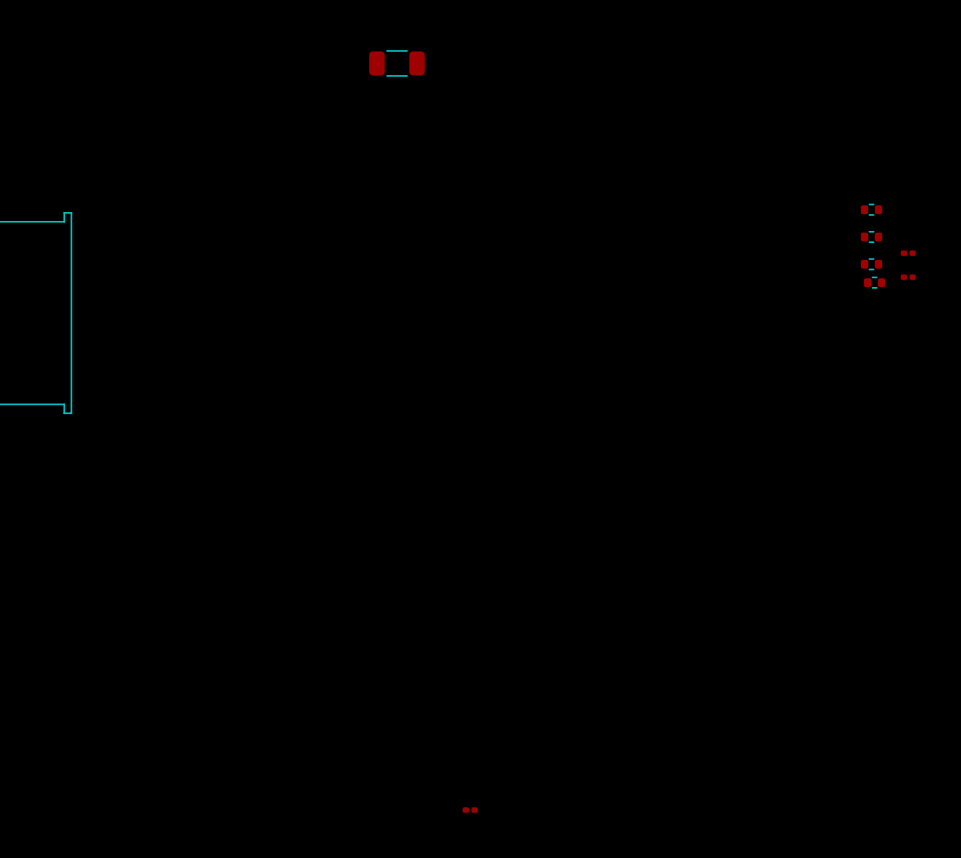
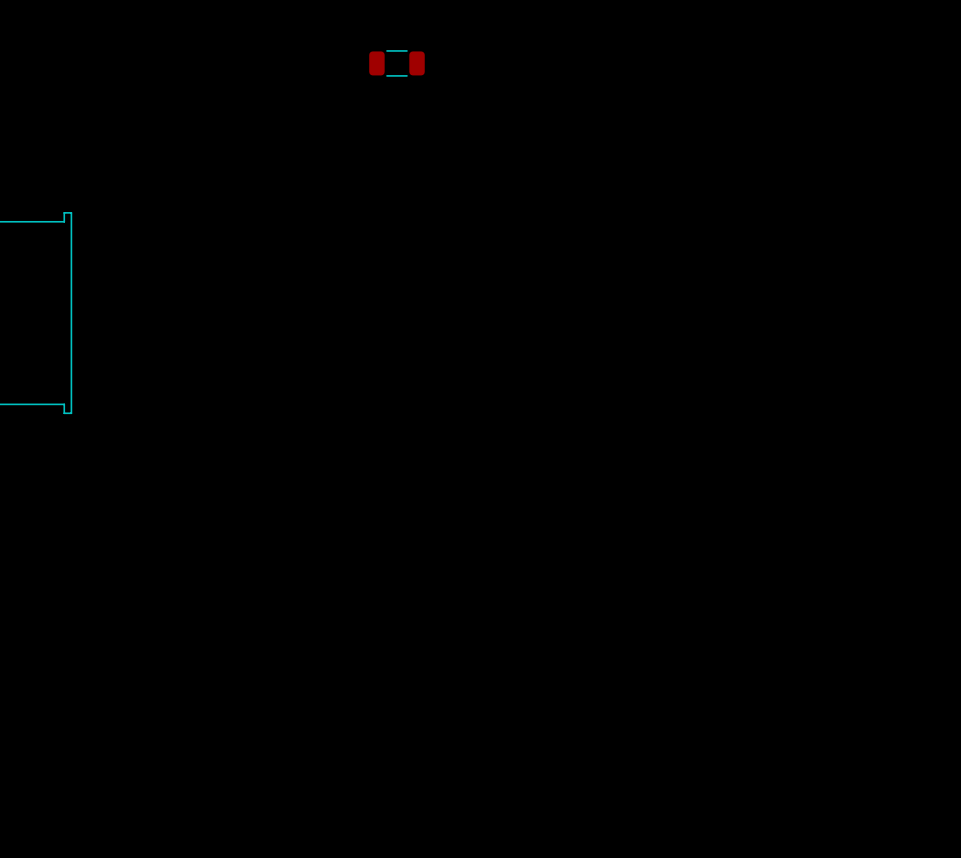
part: (871, 209) -> none
part: (871, 236) -> none
part: (908, 253) -> none
part: (871, 264) -> none
part: (908, 277) -> none
part: (874, 282) -> none
part: (470, 810) -> none

